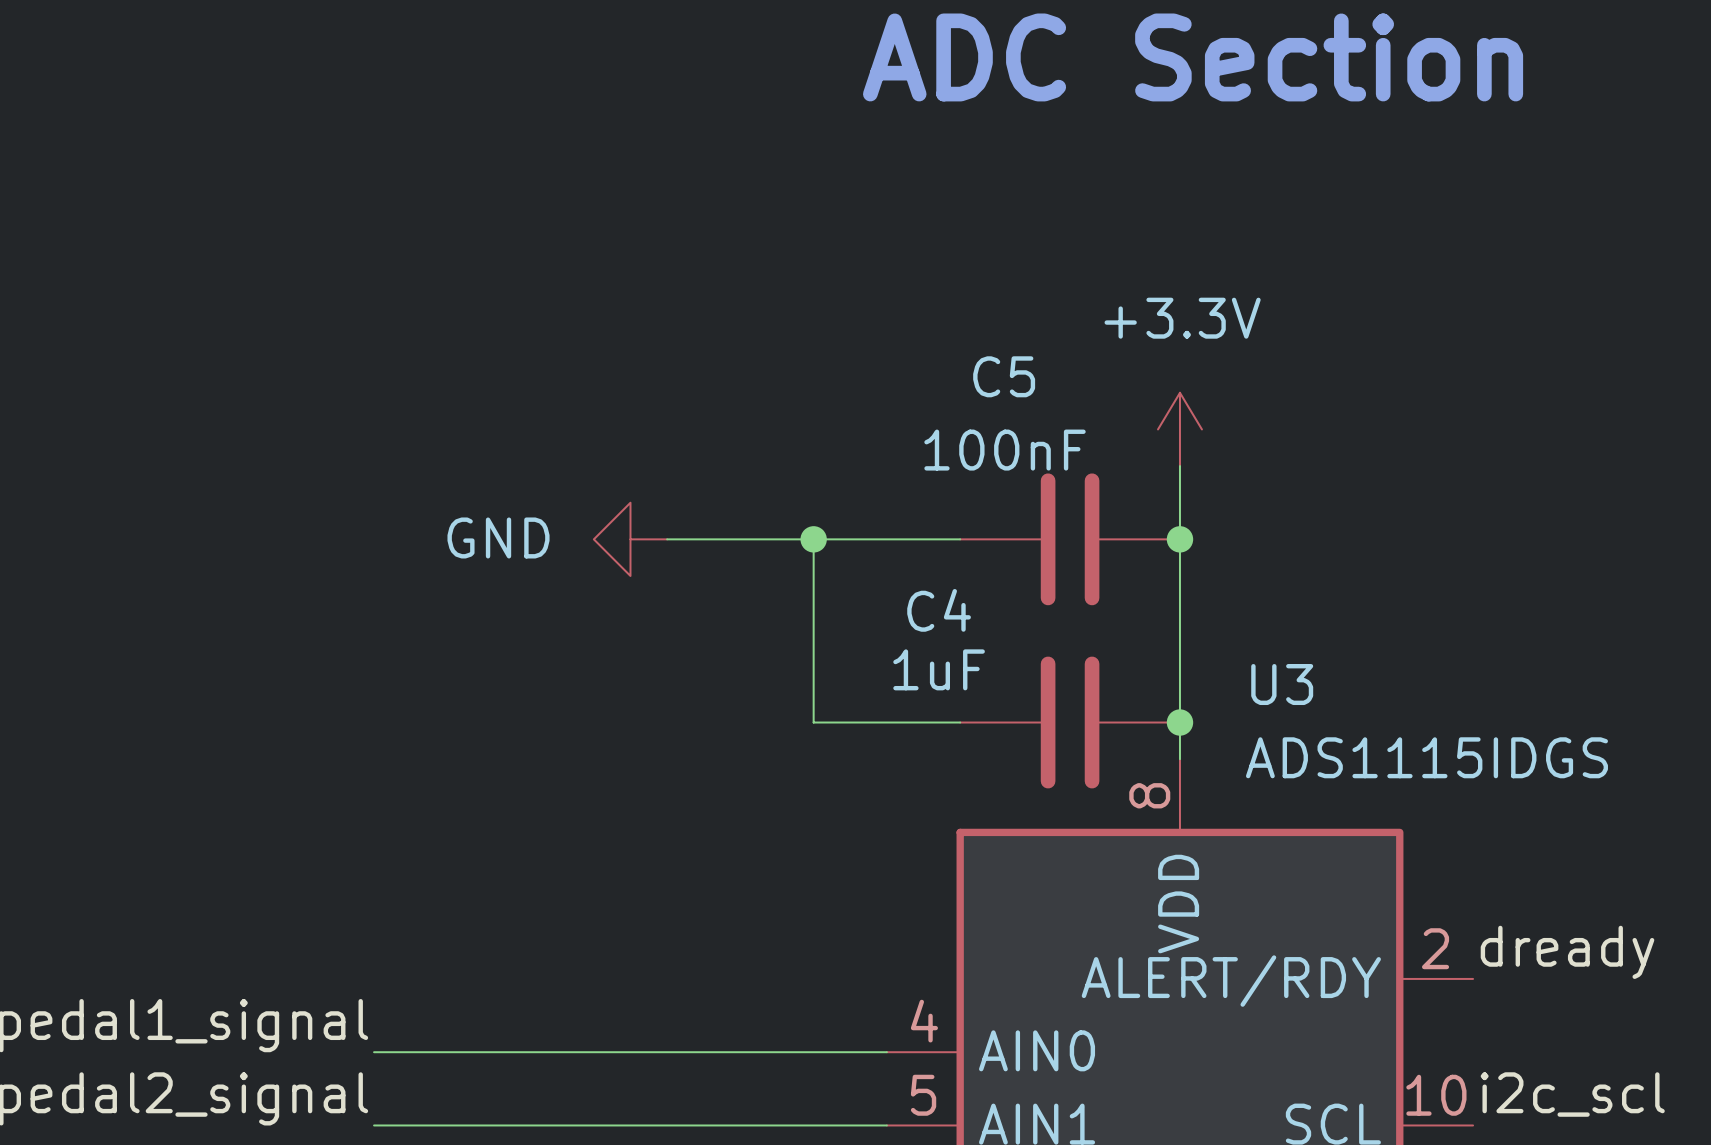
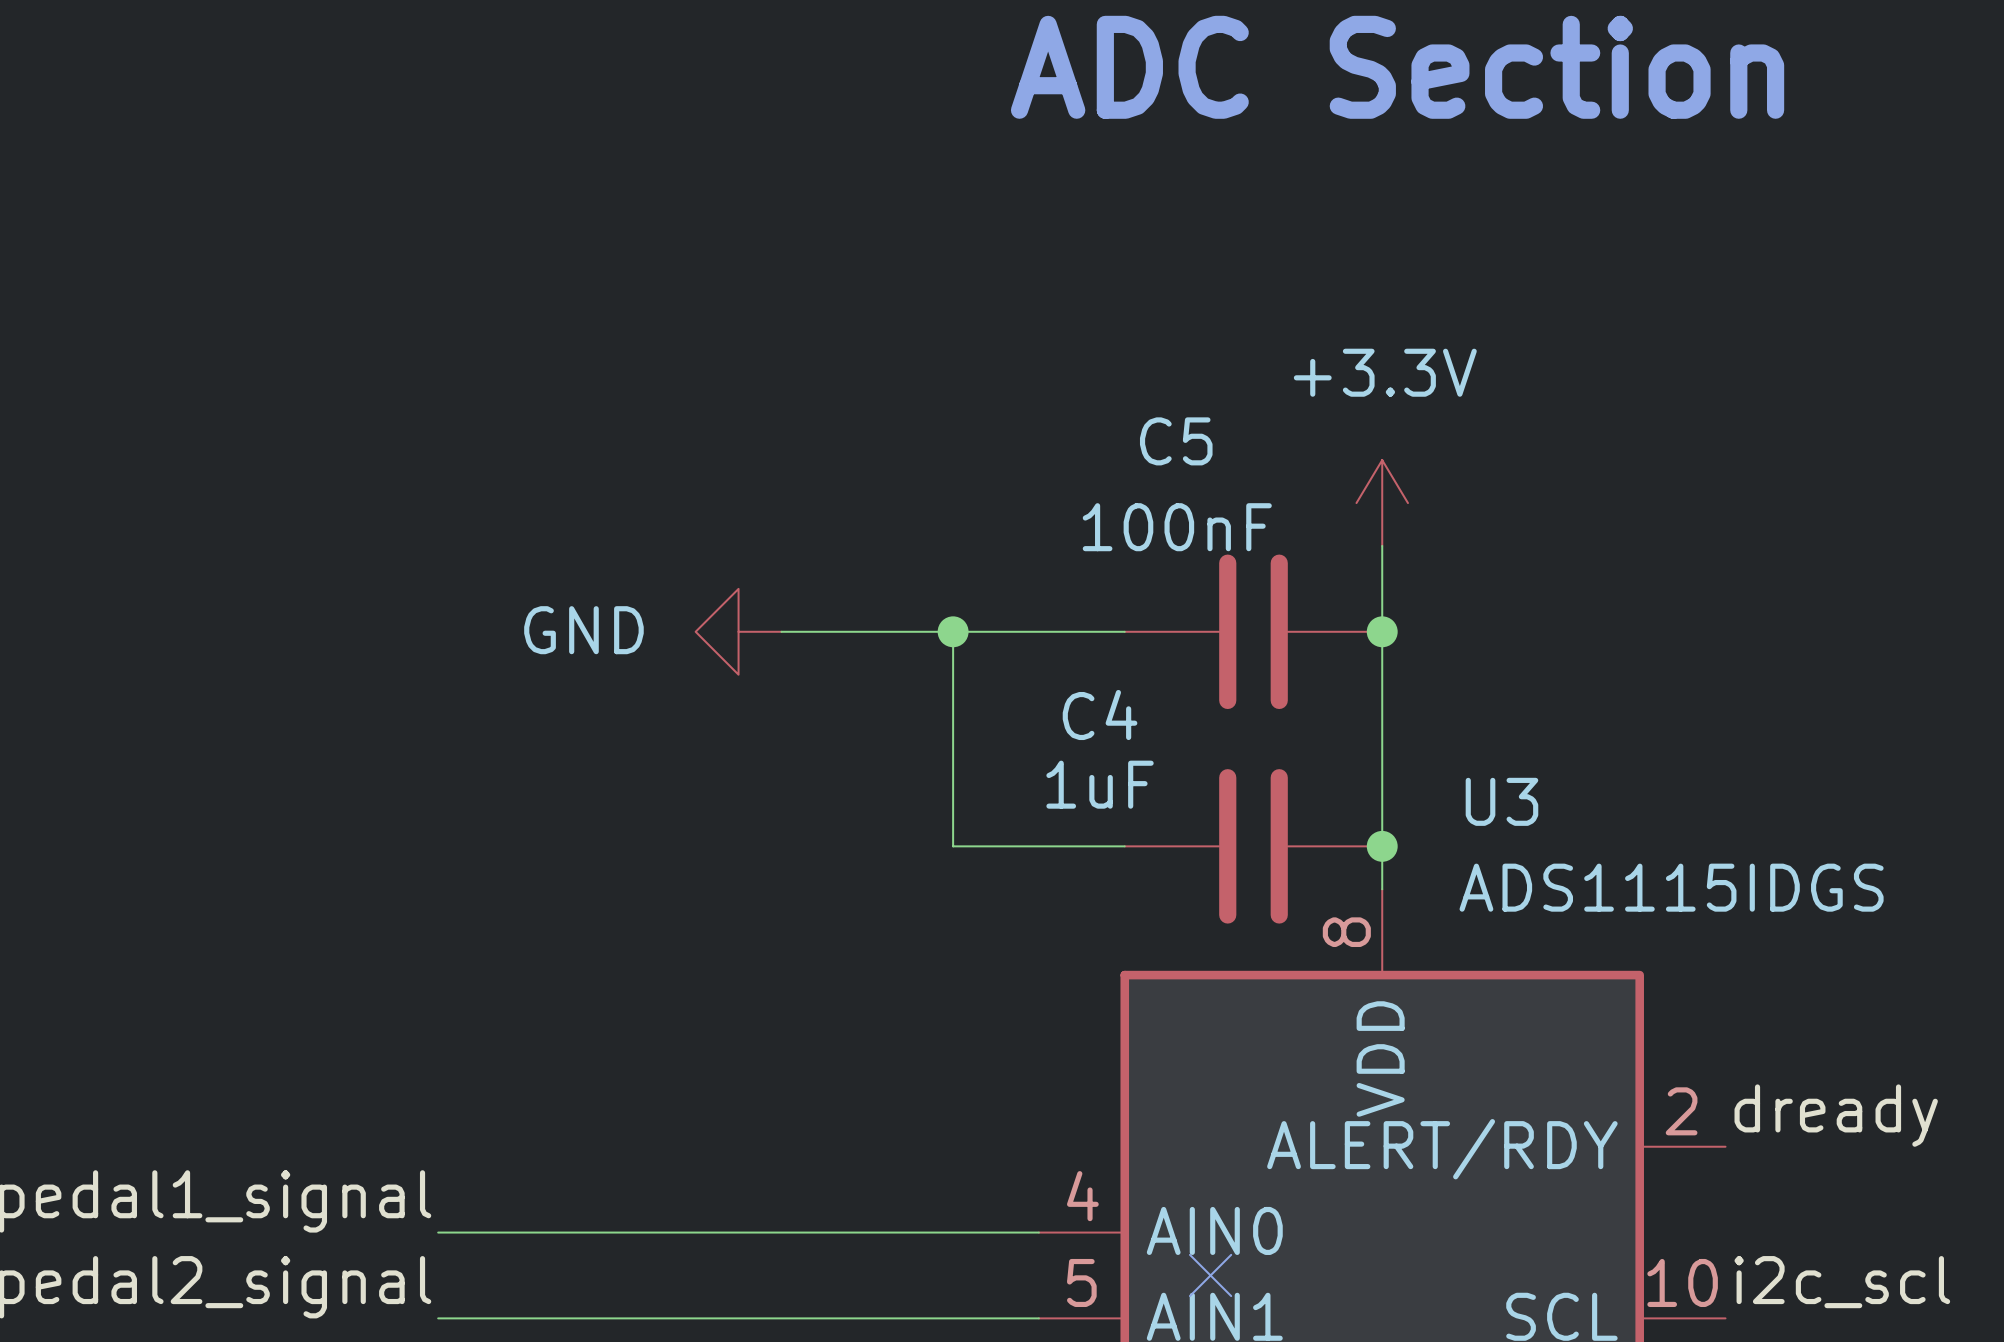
no-connect mark: none -> (1210, 1275)

